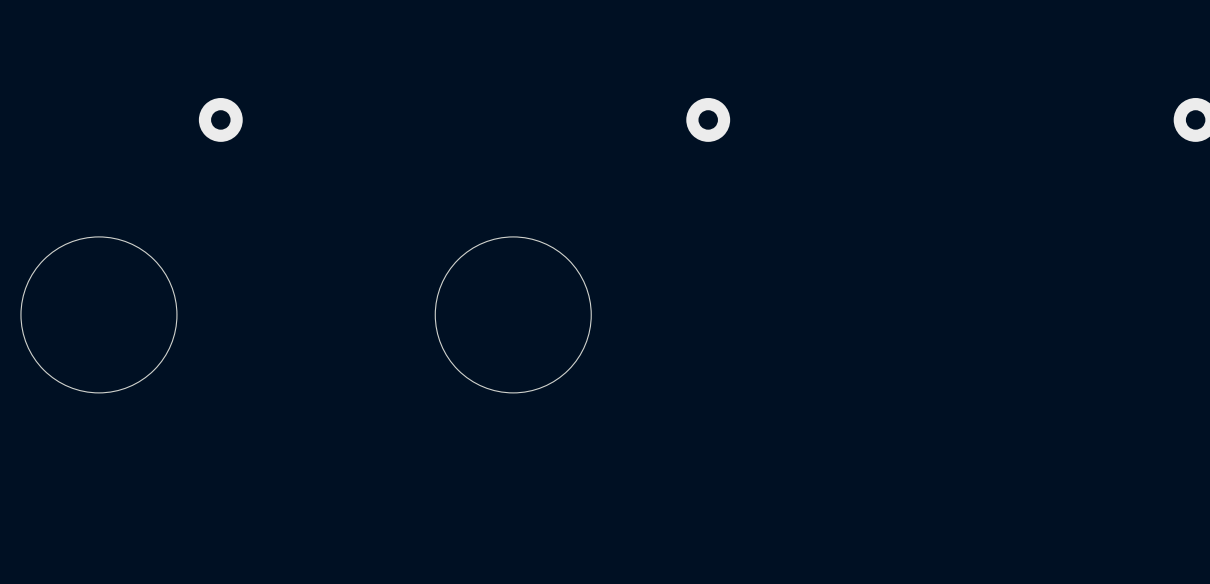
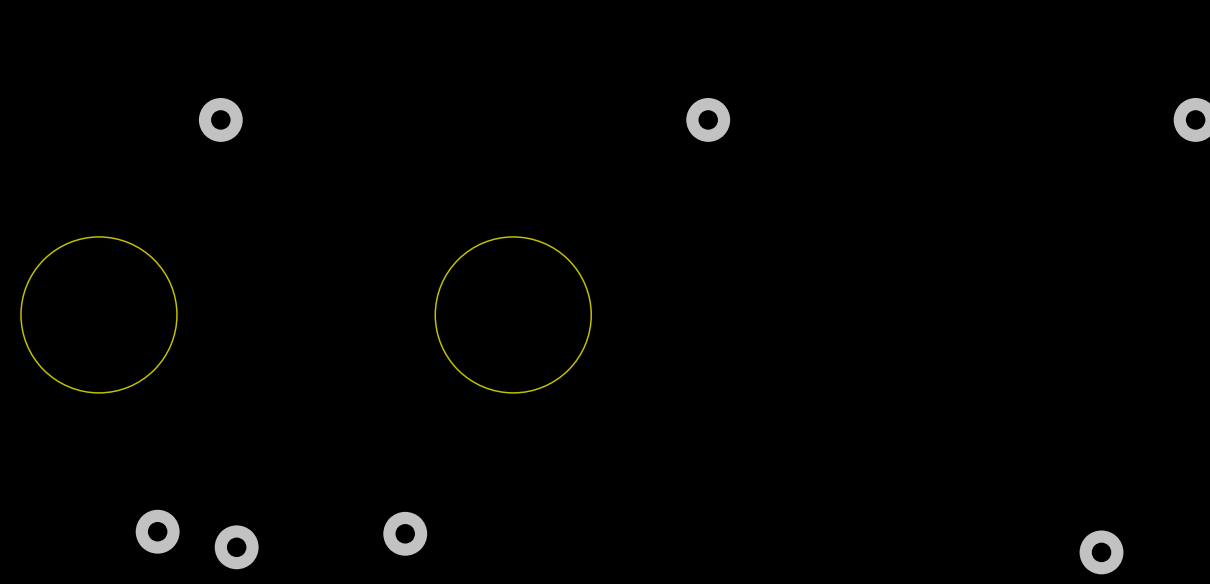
via: none -> (157, 531)
via: none -> (405, 533)
via: none -> (236, 547)
via: none -> (1101, 552)

